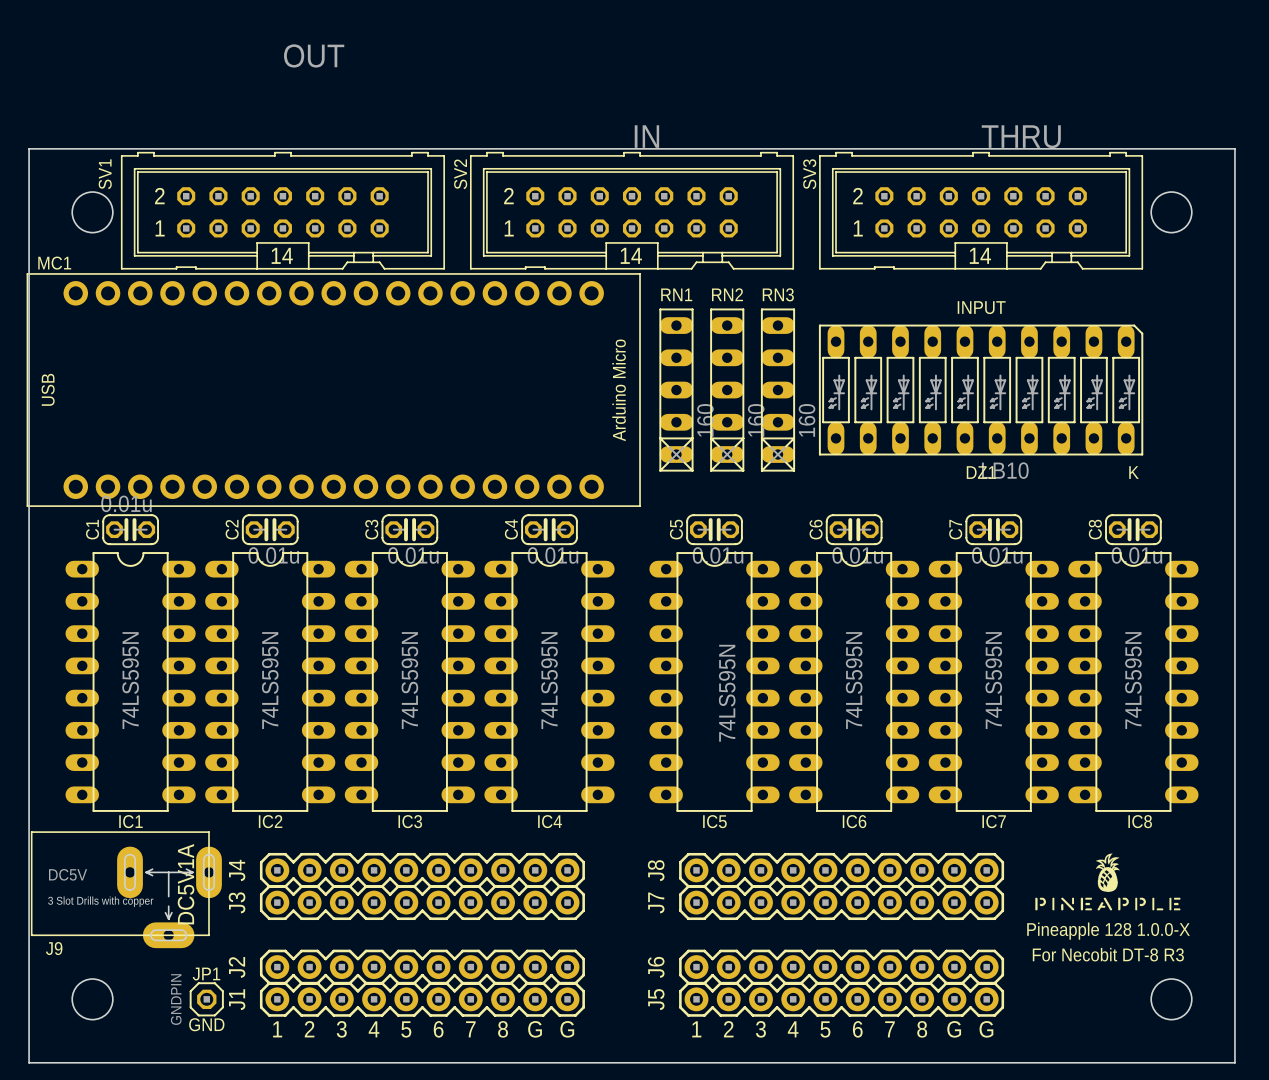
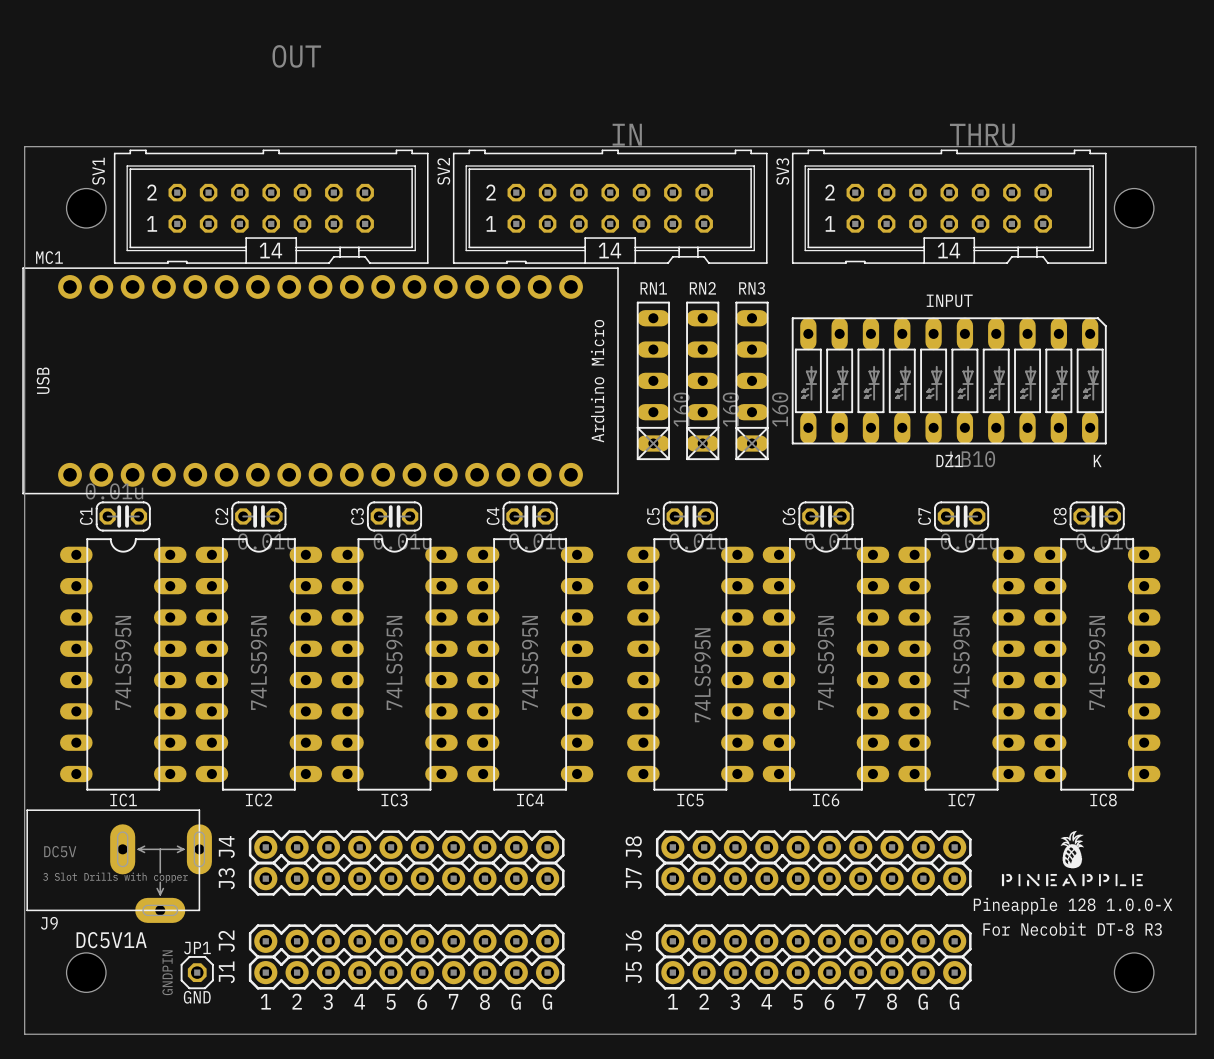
text rotation: 0° (186, 884) -> 90° clockwise (111, 940)
text position: DC5V1A (186, 884) -> DC5V1A (111, 940)

